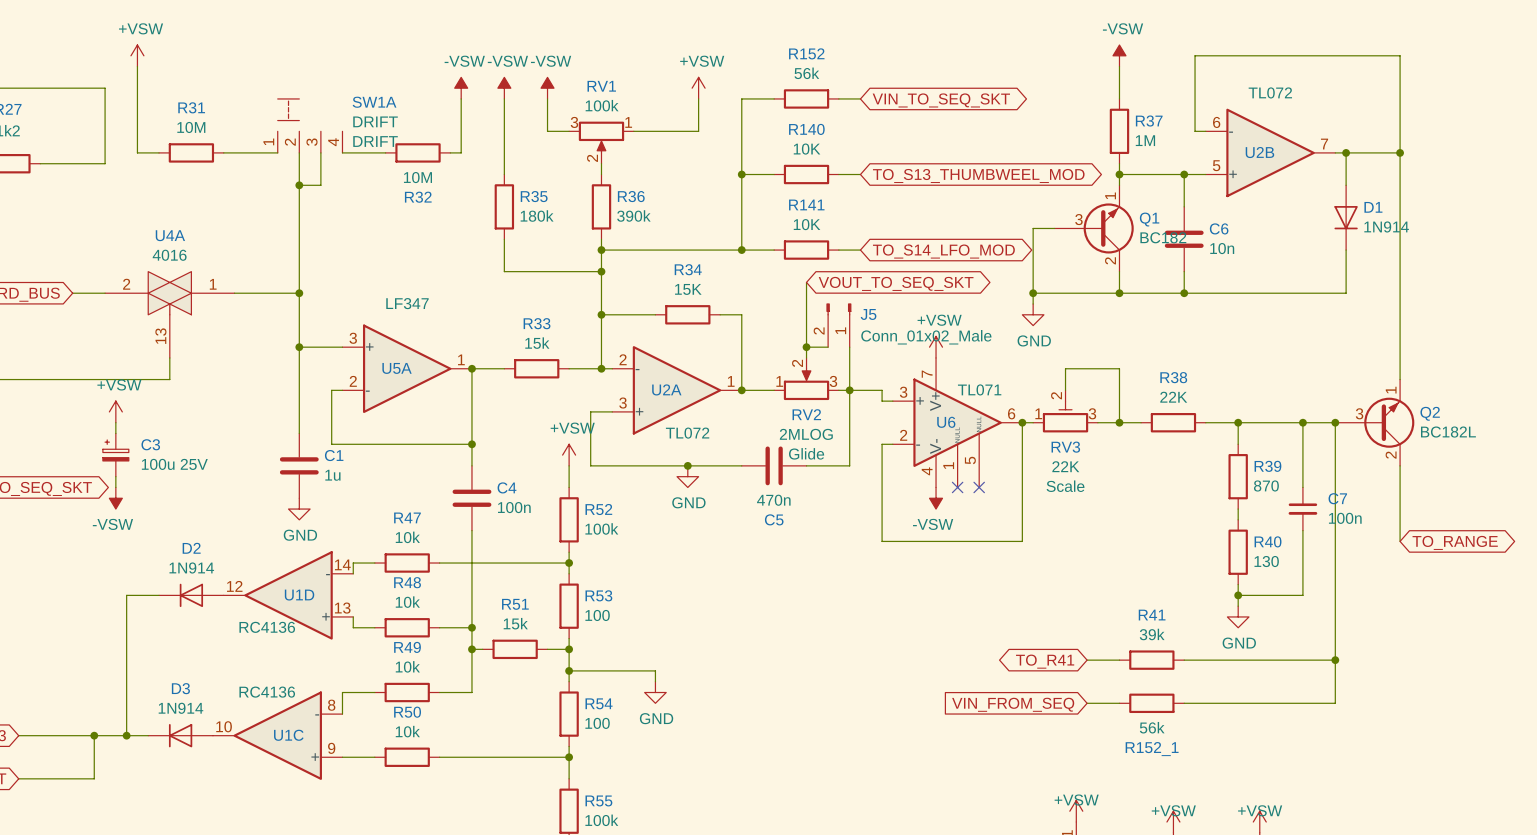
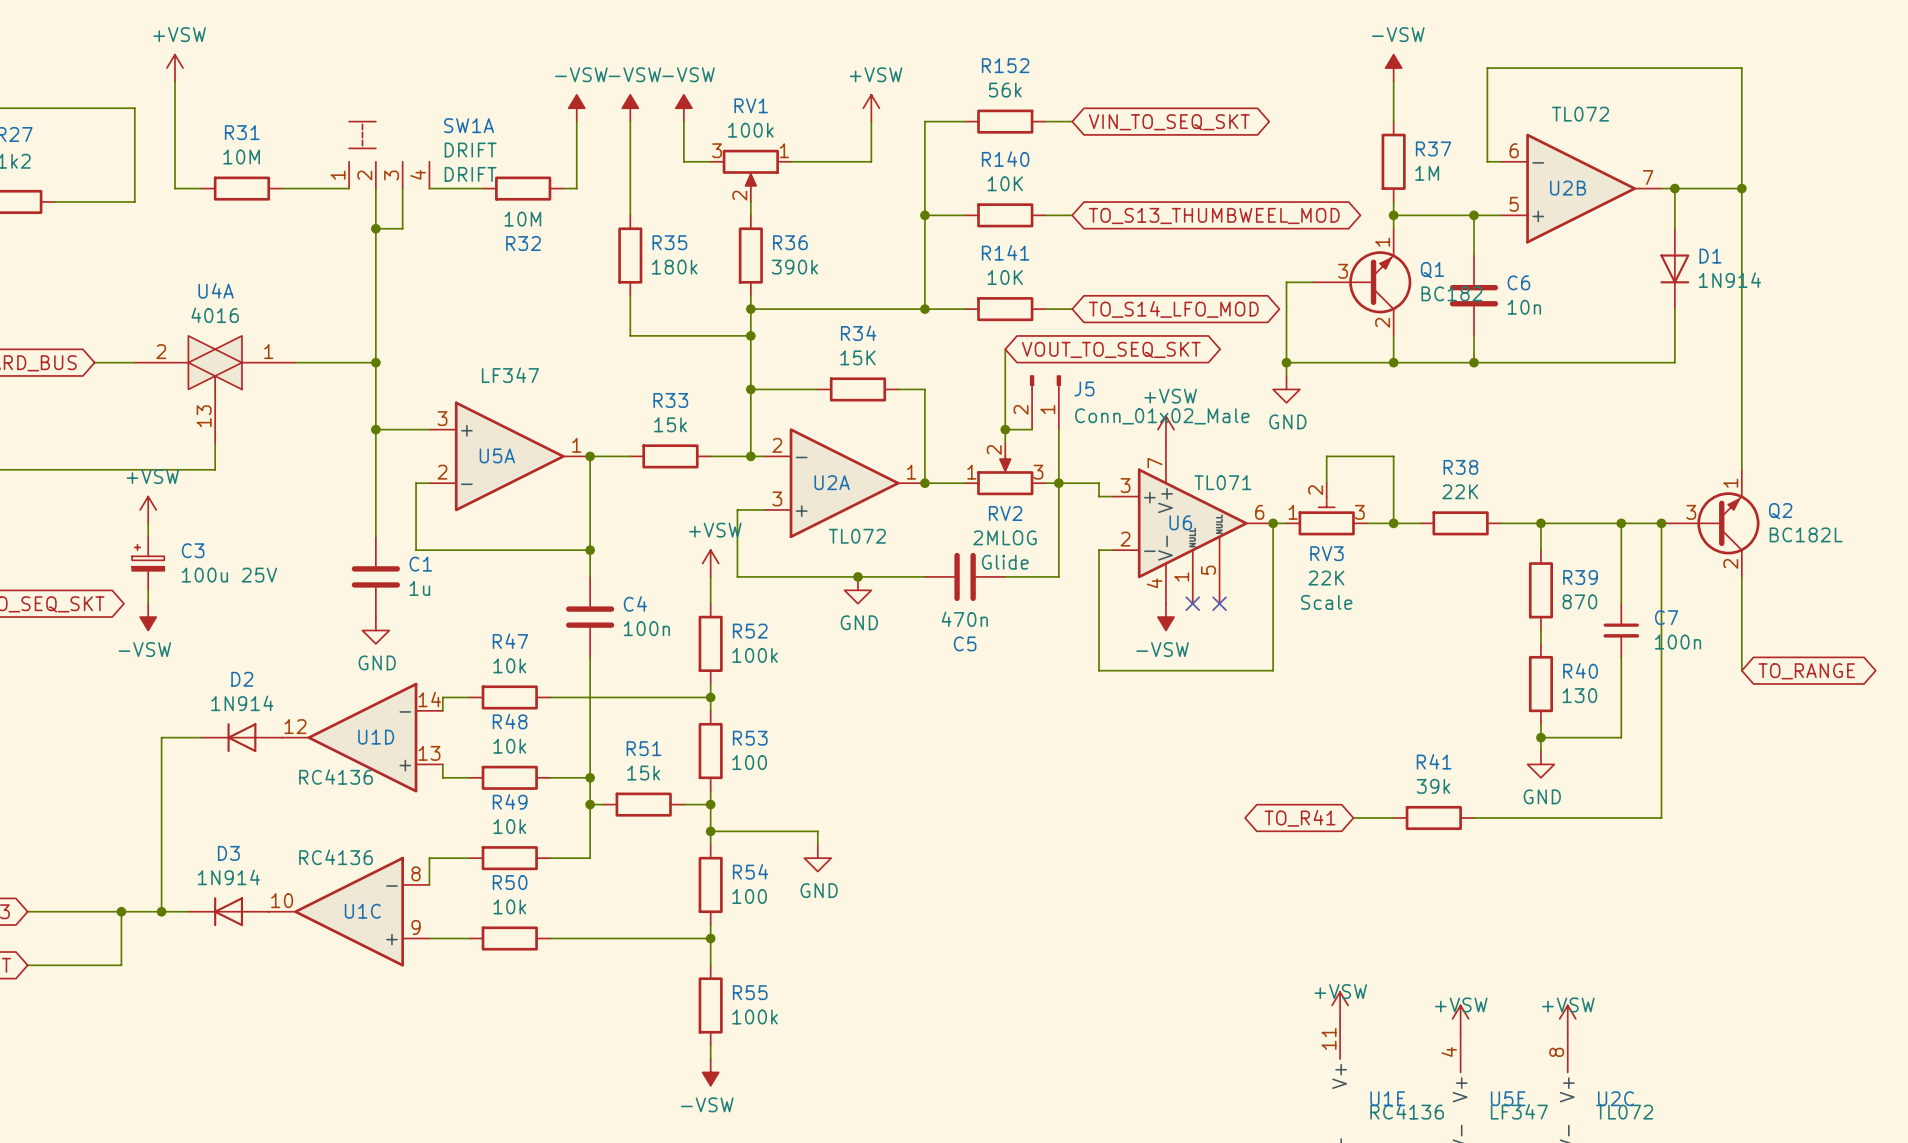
wire: (1335, 660) (1335, 703) (1184, 703) -> none
junction: (1335, 660) -> none
wire: (1087, 703) (1119, 703) -> none
R152_1: 56k (1151, 703) -> none
global label: VIN_FROM_SEQ (1013, 704) -> none

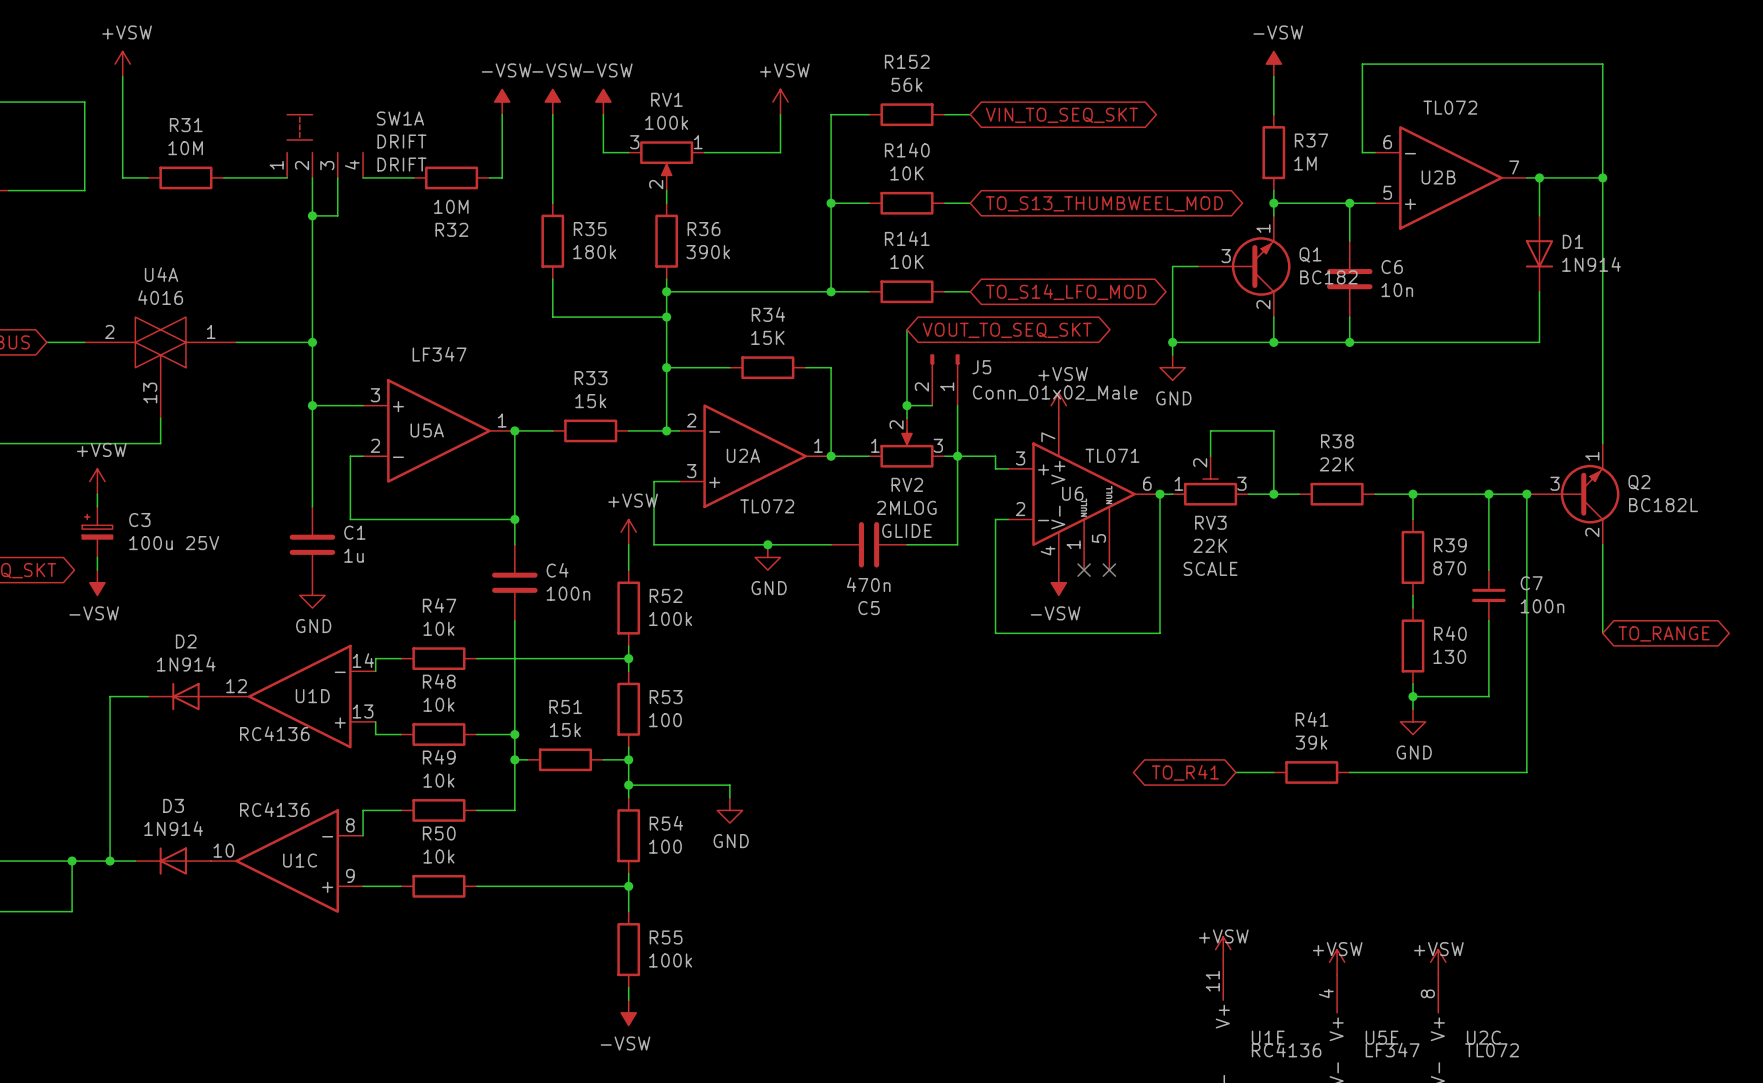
RV2 text: Glide (1005, 562) -> GLIDE (906, 530)
RV3 text: Scale (1326, 602) -> SCALE (1210, 568)

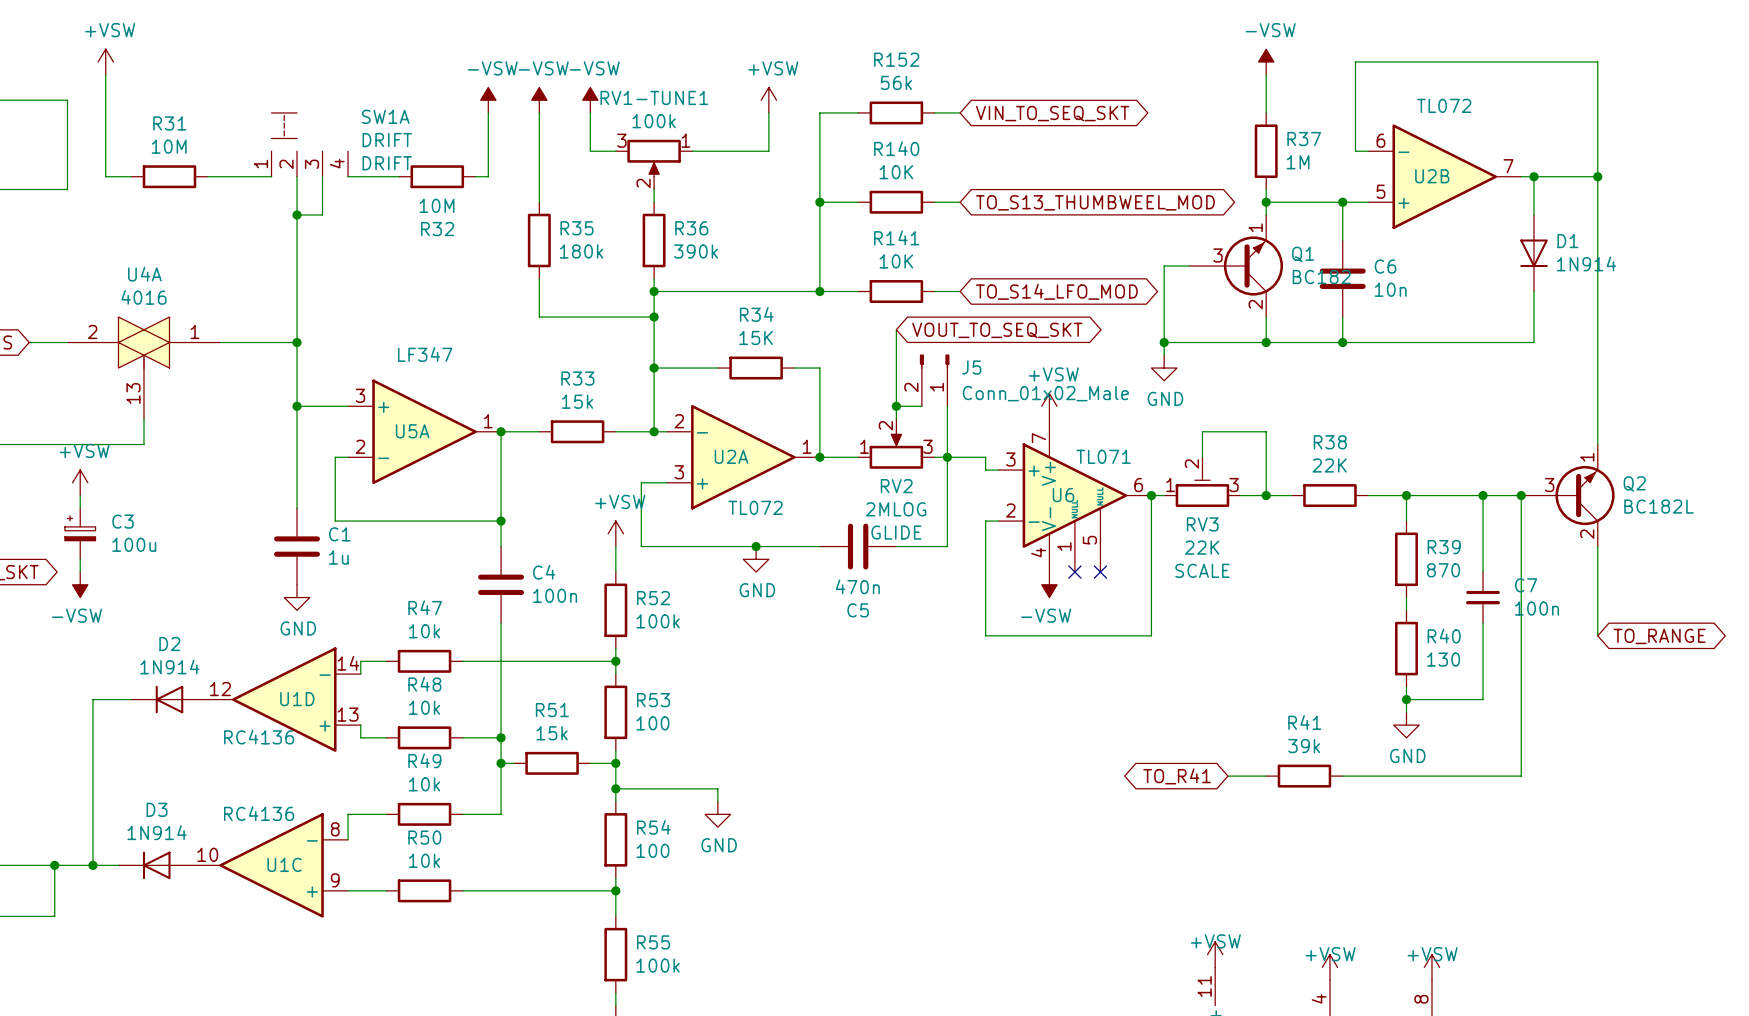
RV1 name: RV1 (666, 99) -> RV1-TUNE1 (654, 97)
C3 value: 100u 25V (174, 543) -> 100u (134, 544)

